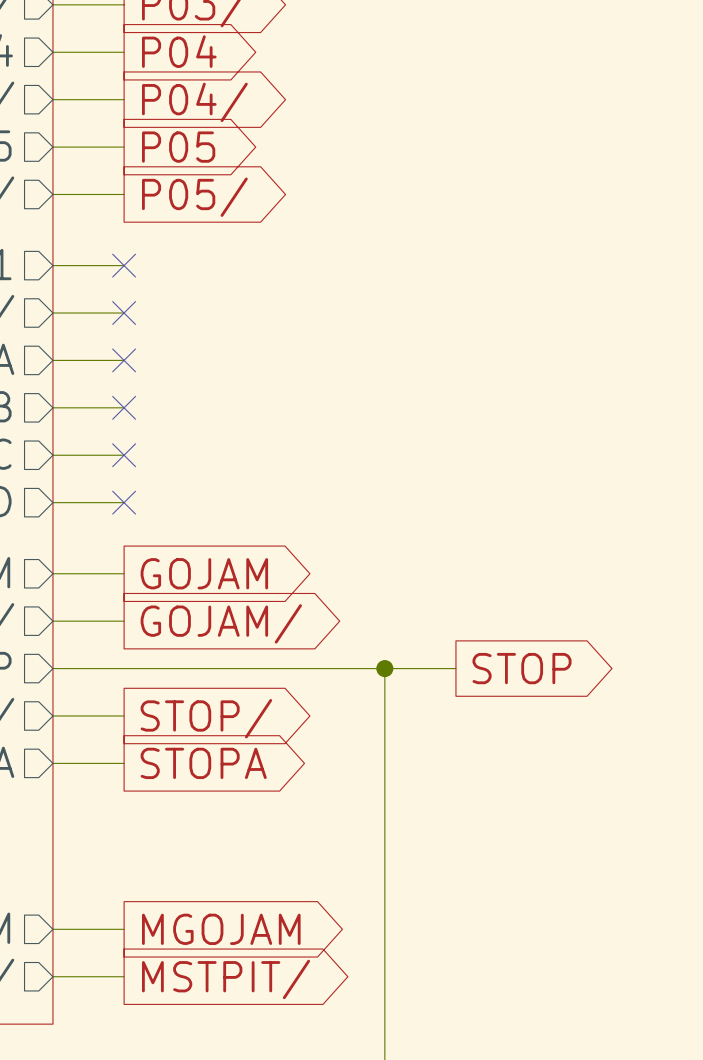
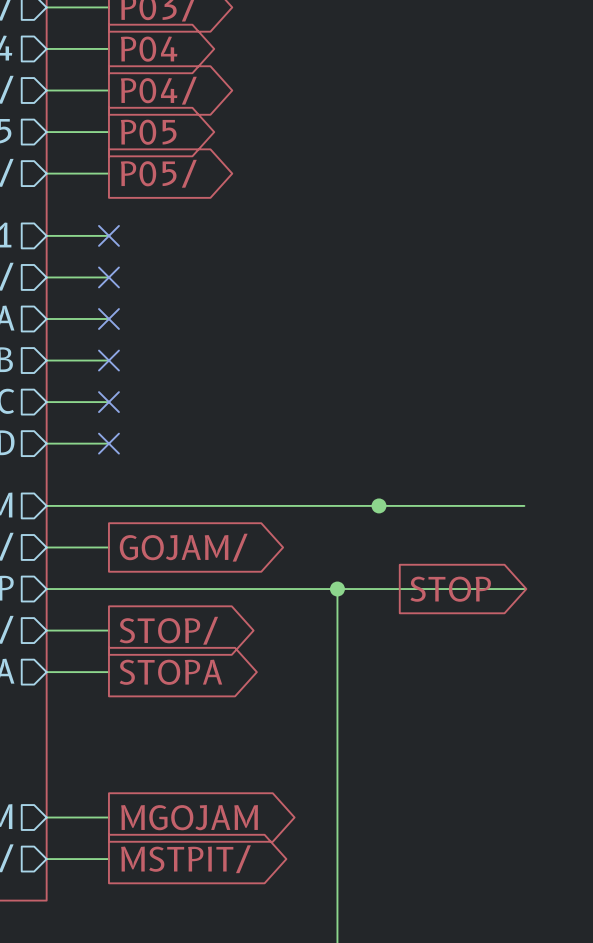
wire: none -> (108, 505) (524, 505)
global label: GOJAM (204, 573) -> none
junction: none -> (378, 505)
wire: none -> (399, 589) (524, 589)

